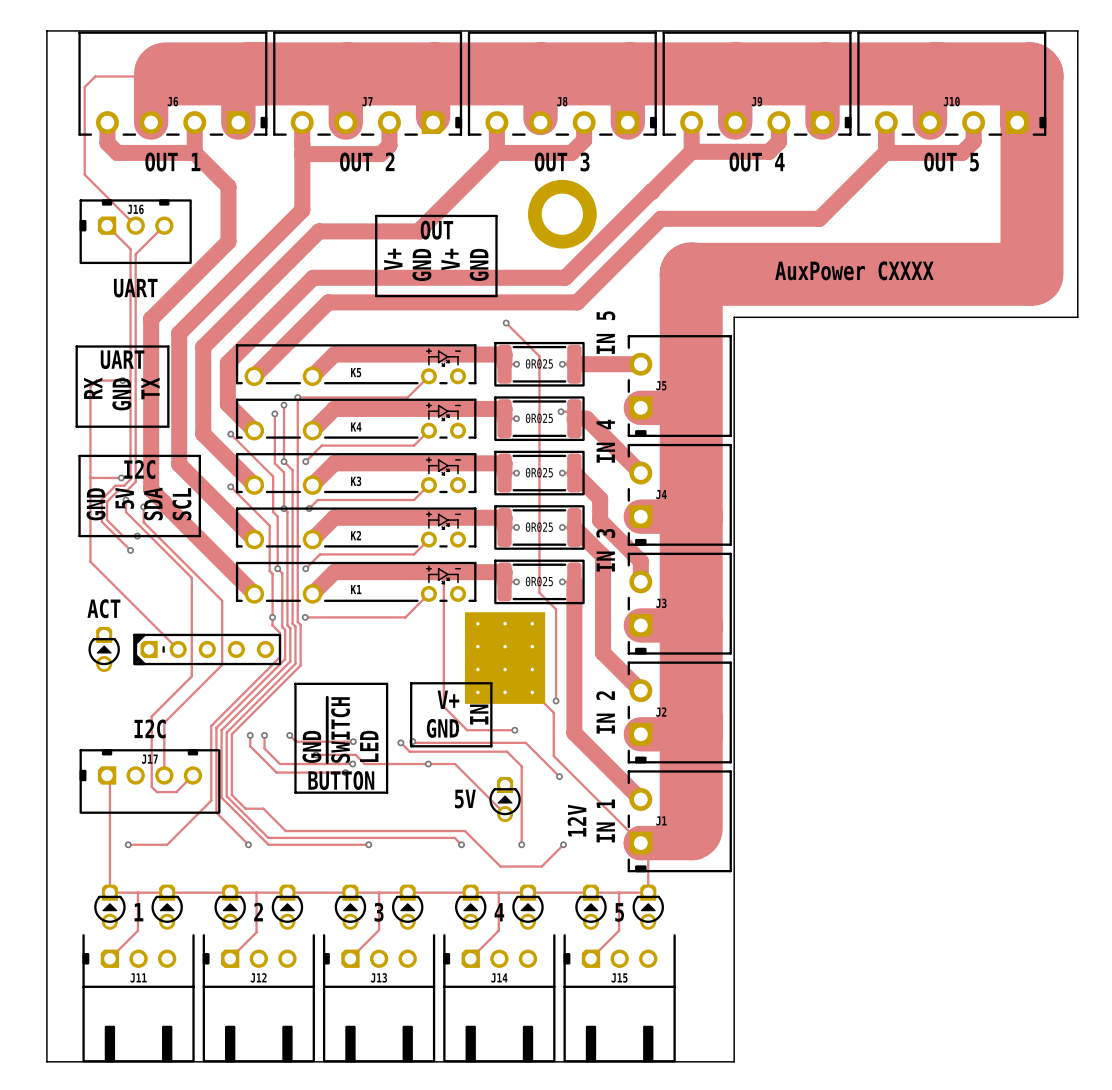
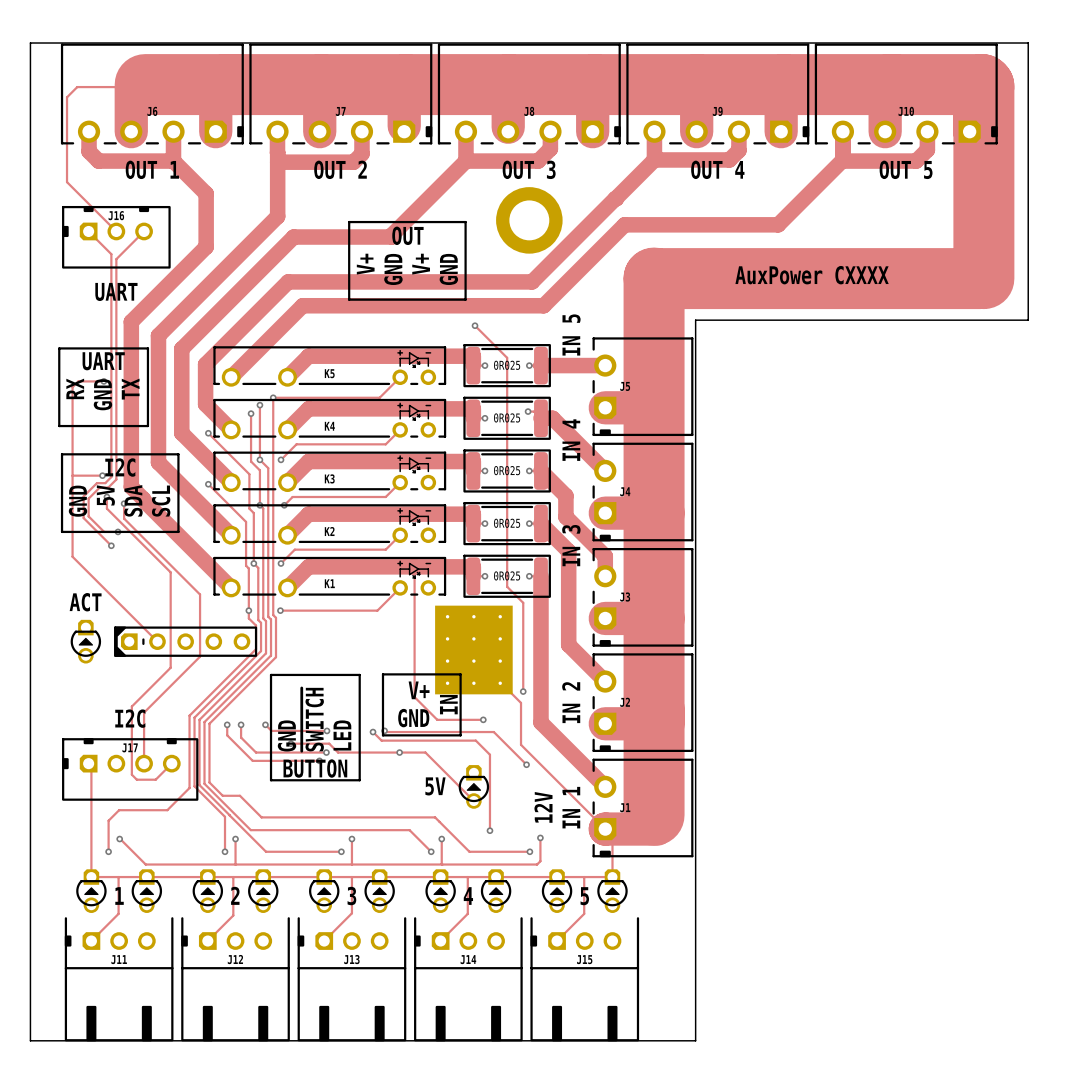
track: (216, 798) (216, 812) (248, 844) -> (194, 786) (225, 816) (225, 851)
track: (188, 823) (167, 844) (128, 844) -> (167, 810) (119, 810) (108, 820) (108, 851)
track: (268, 837) (454, 837) (461, 844) -> (244, 824) (250, 830) (409, 830) (431, 851)
via: (128, 844) -> none
via: (248, 844) -> none
track: (268, 844) (368, 844) -> (244, 830) (266, 851) (341, 851)
via: (368, 844) -> none
via: (461, 844) -> none
track: (563, 844) (541, 866) -> (529, 851) (509, 851)
via: (563, 844) -> none
track: none -> (540, 837) (540, 861) (537, 864) (145, 864) (120, 837) (119, 839)
via: none -> (540, 837)
via: none -> (119, 839)
track: none -> (235, 839) (235, 864)
via: none -> (235, 839)
track: none -> (351, 839) (351, 864)
via: none -> (351, 839)
track: none -> (441, 839) (442, 864)
via: none -> (441, 839)
via: none -> (108, 851)
via: none -> (225, 851)
via: none -> (341, 851)
via: none -> (431, 851)
via: none -> (529, 851)

